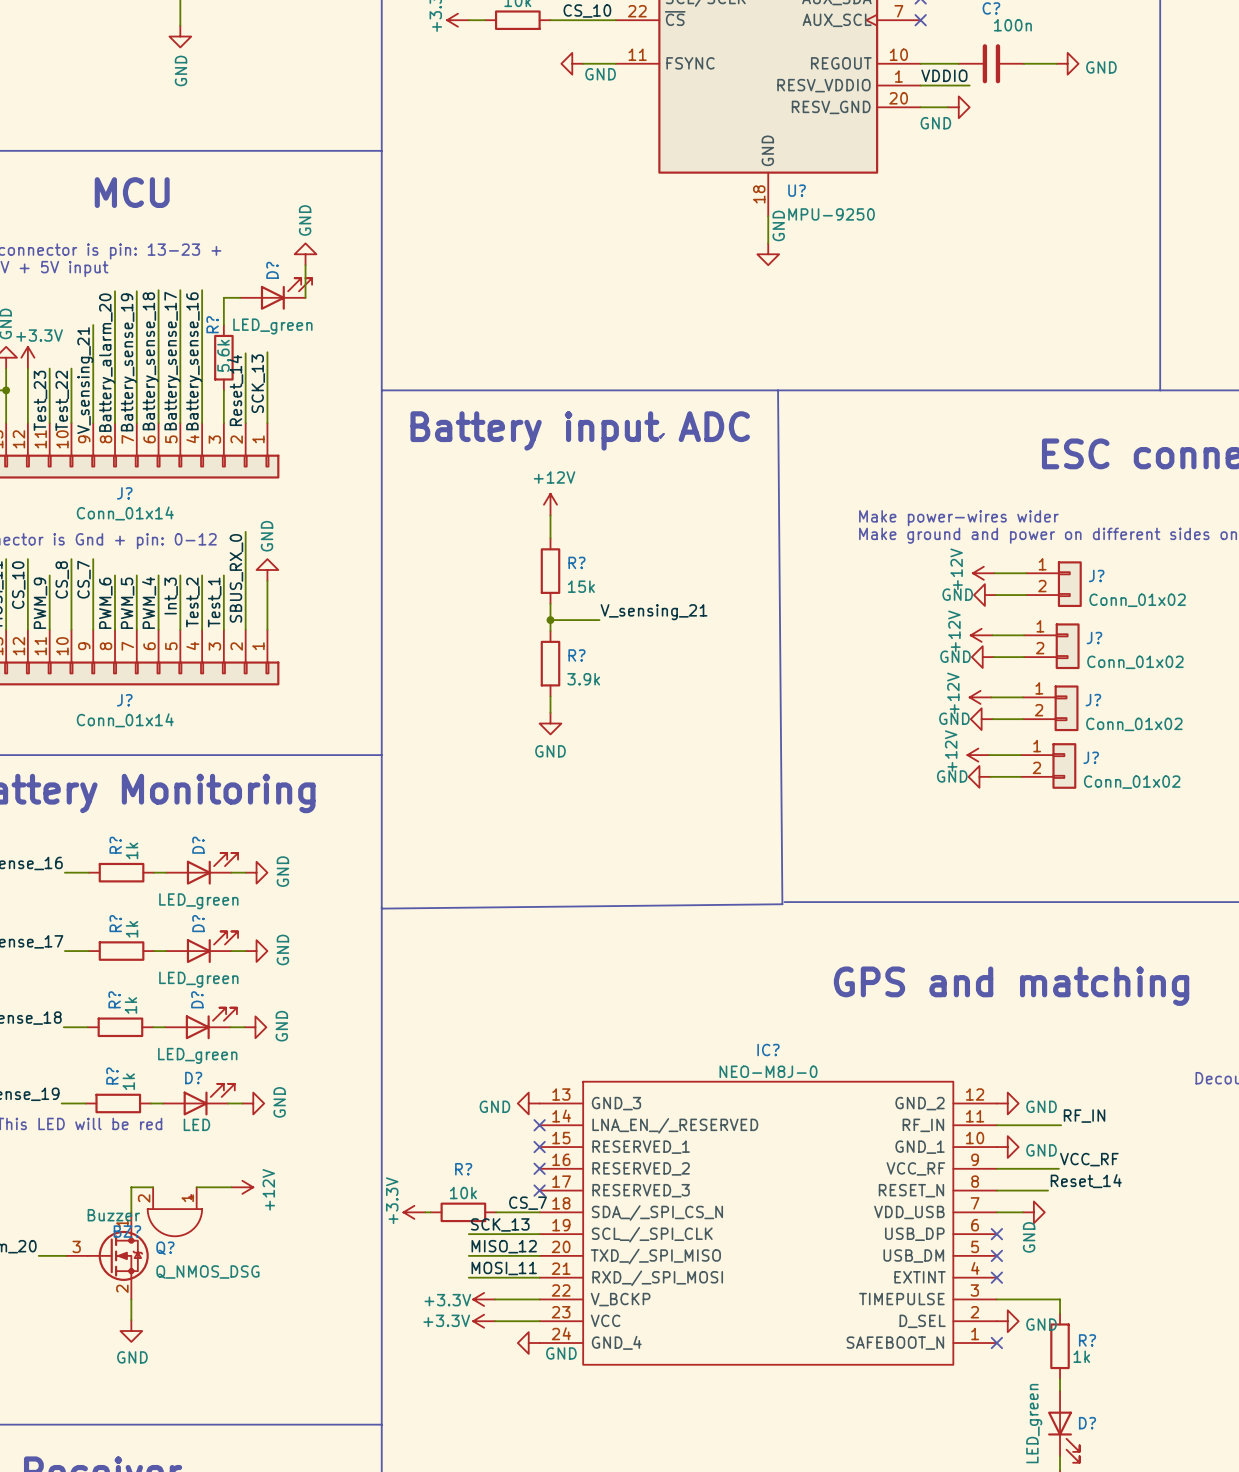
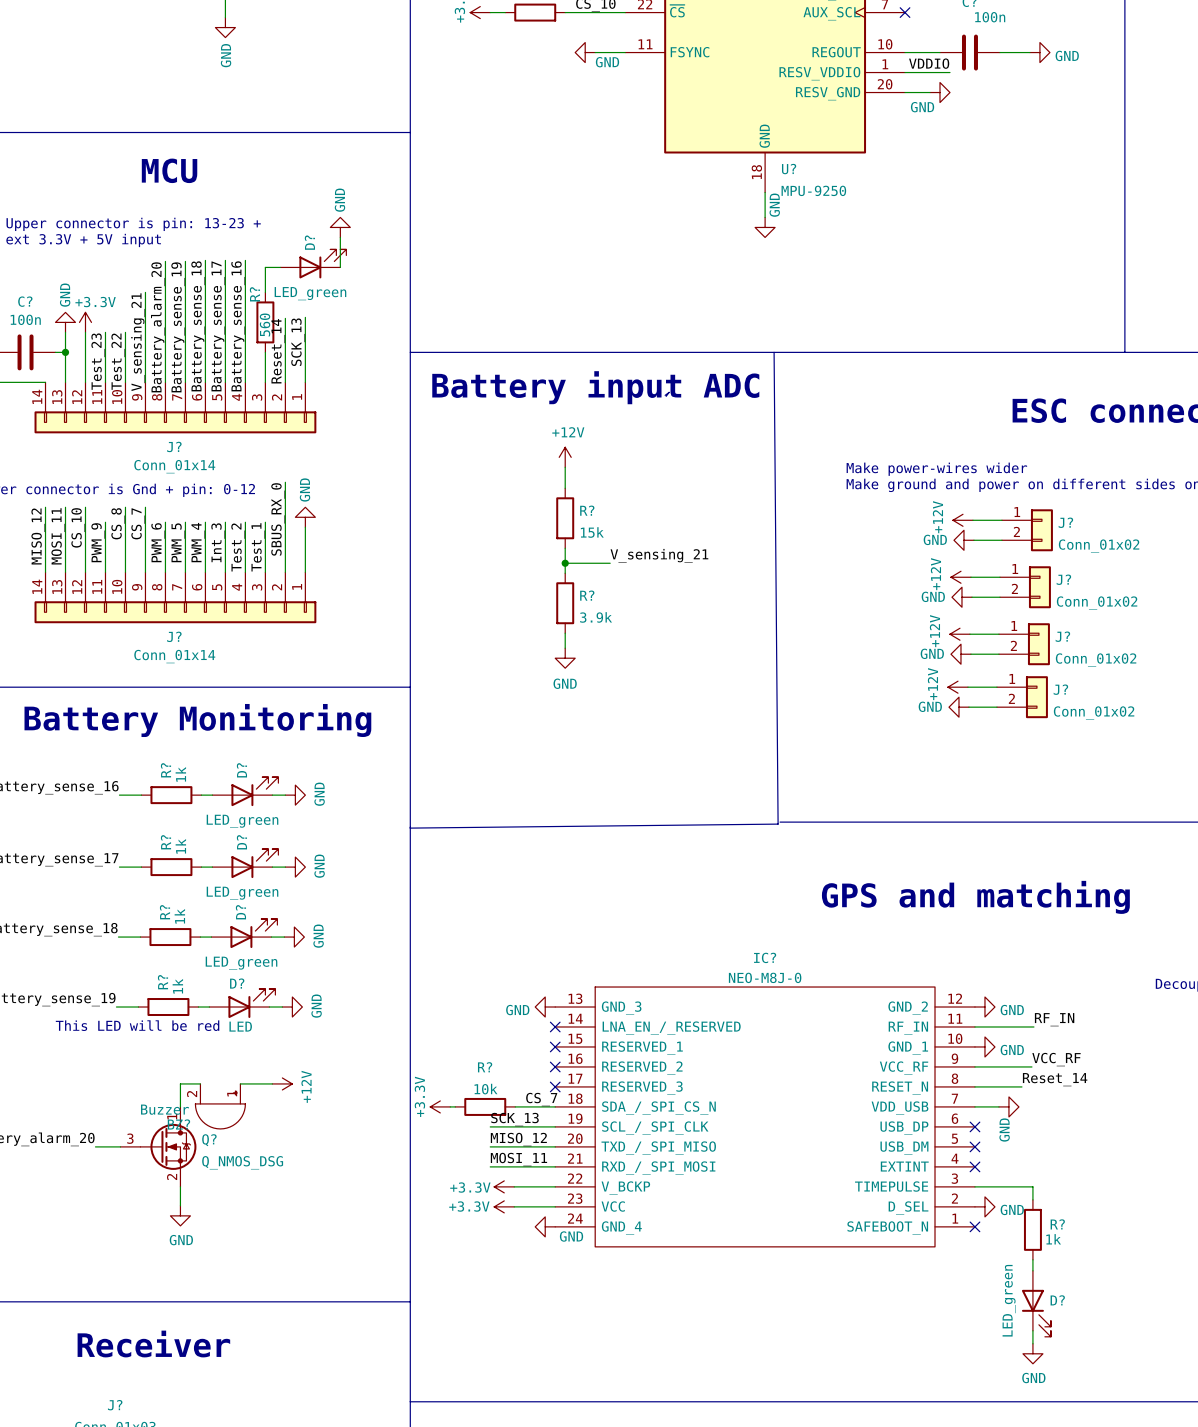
R? value: 5.6k (223, 355) -> 560 (265, 324)

